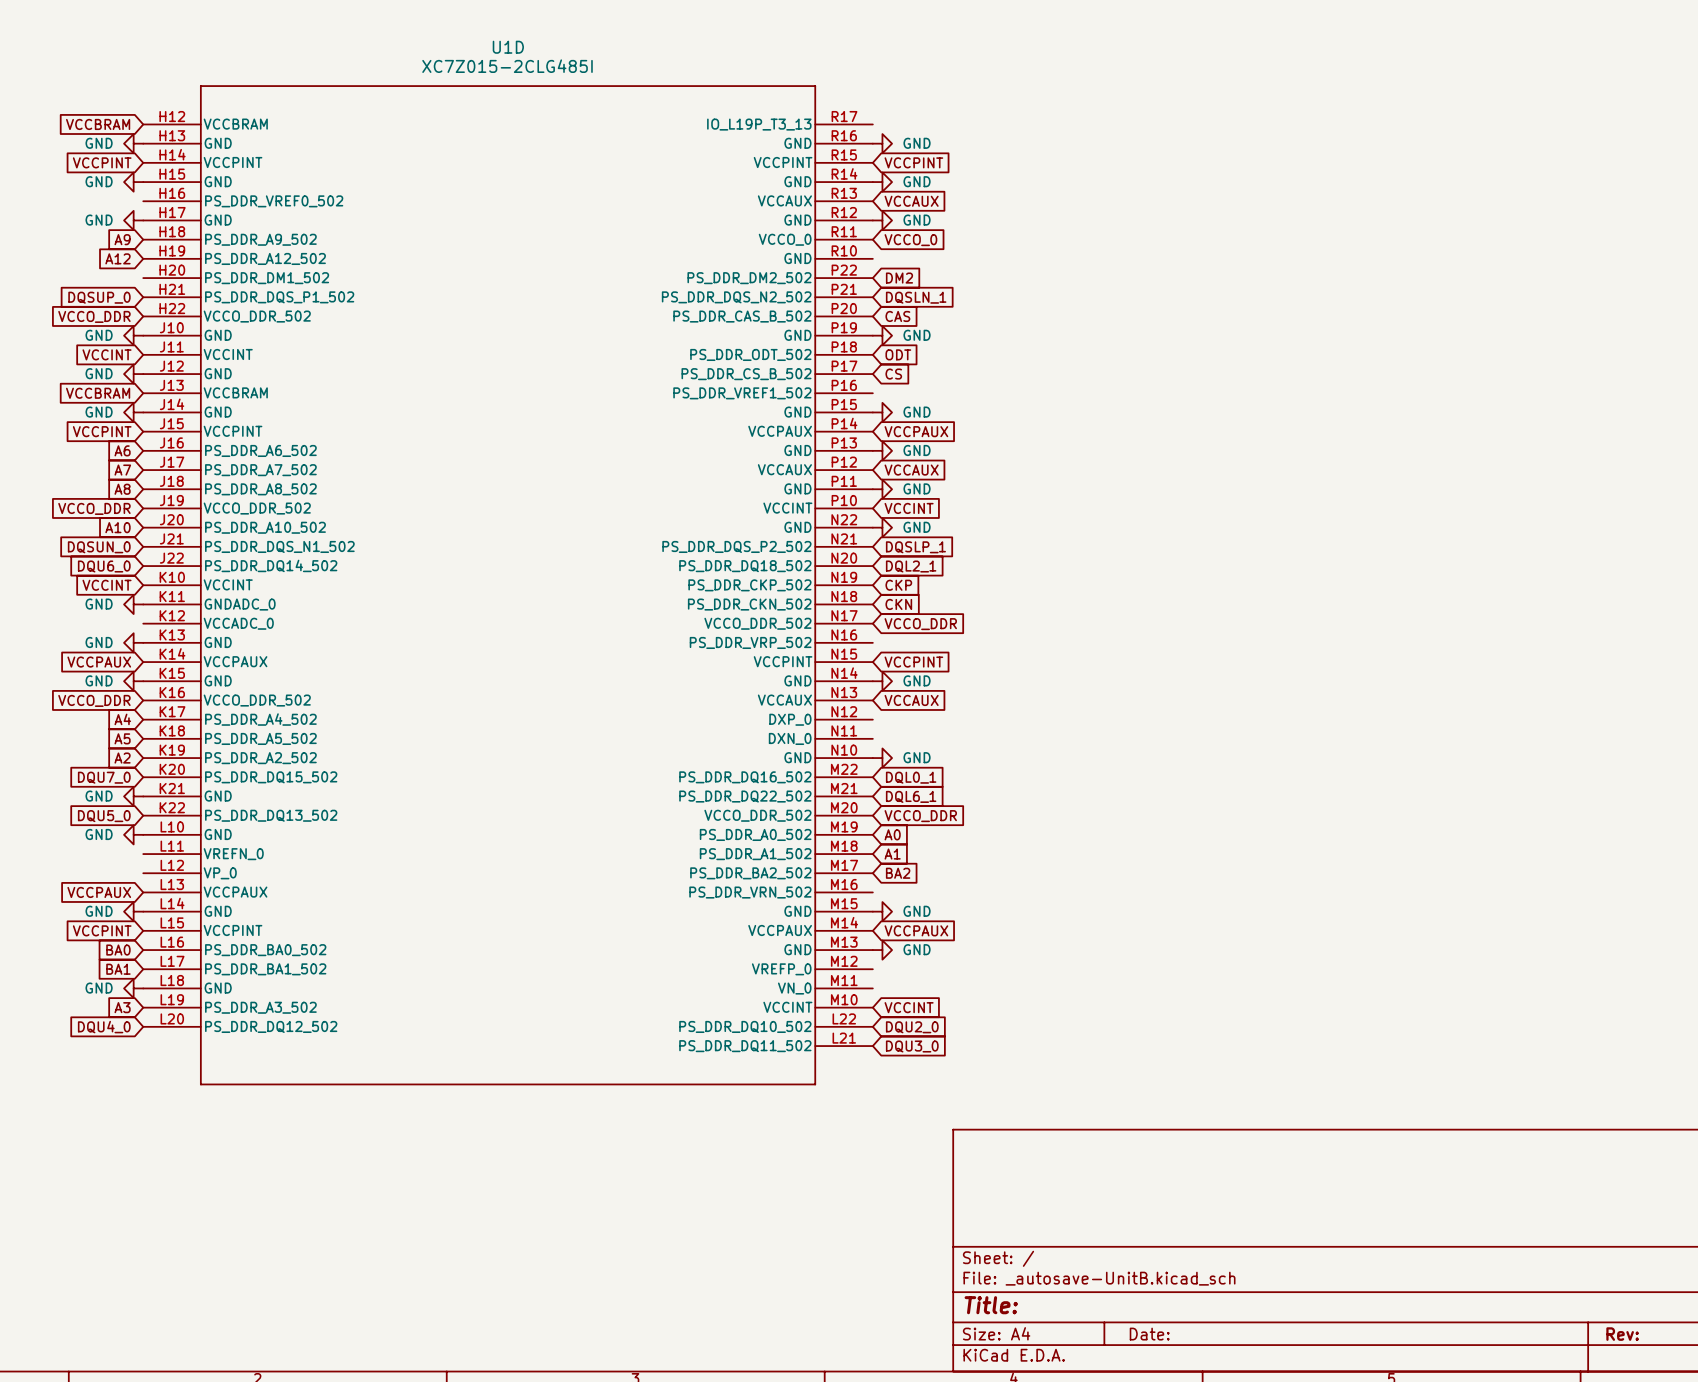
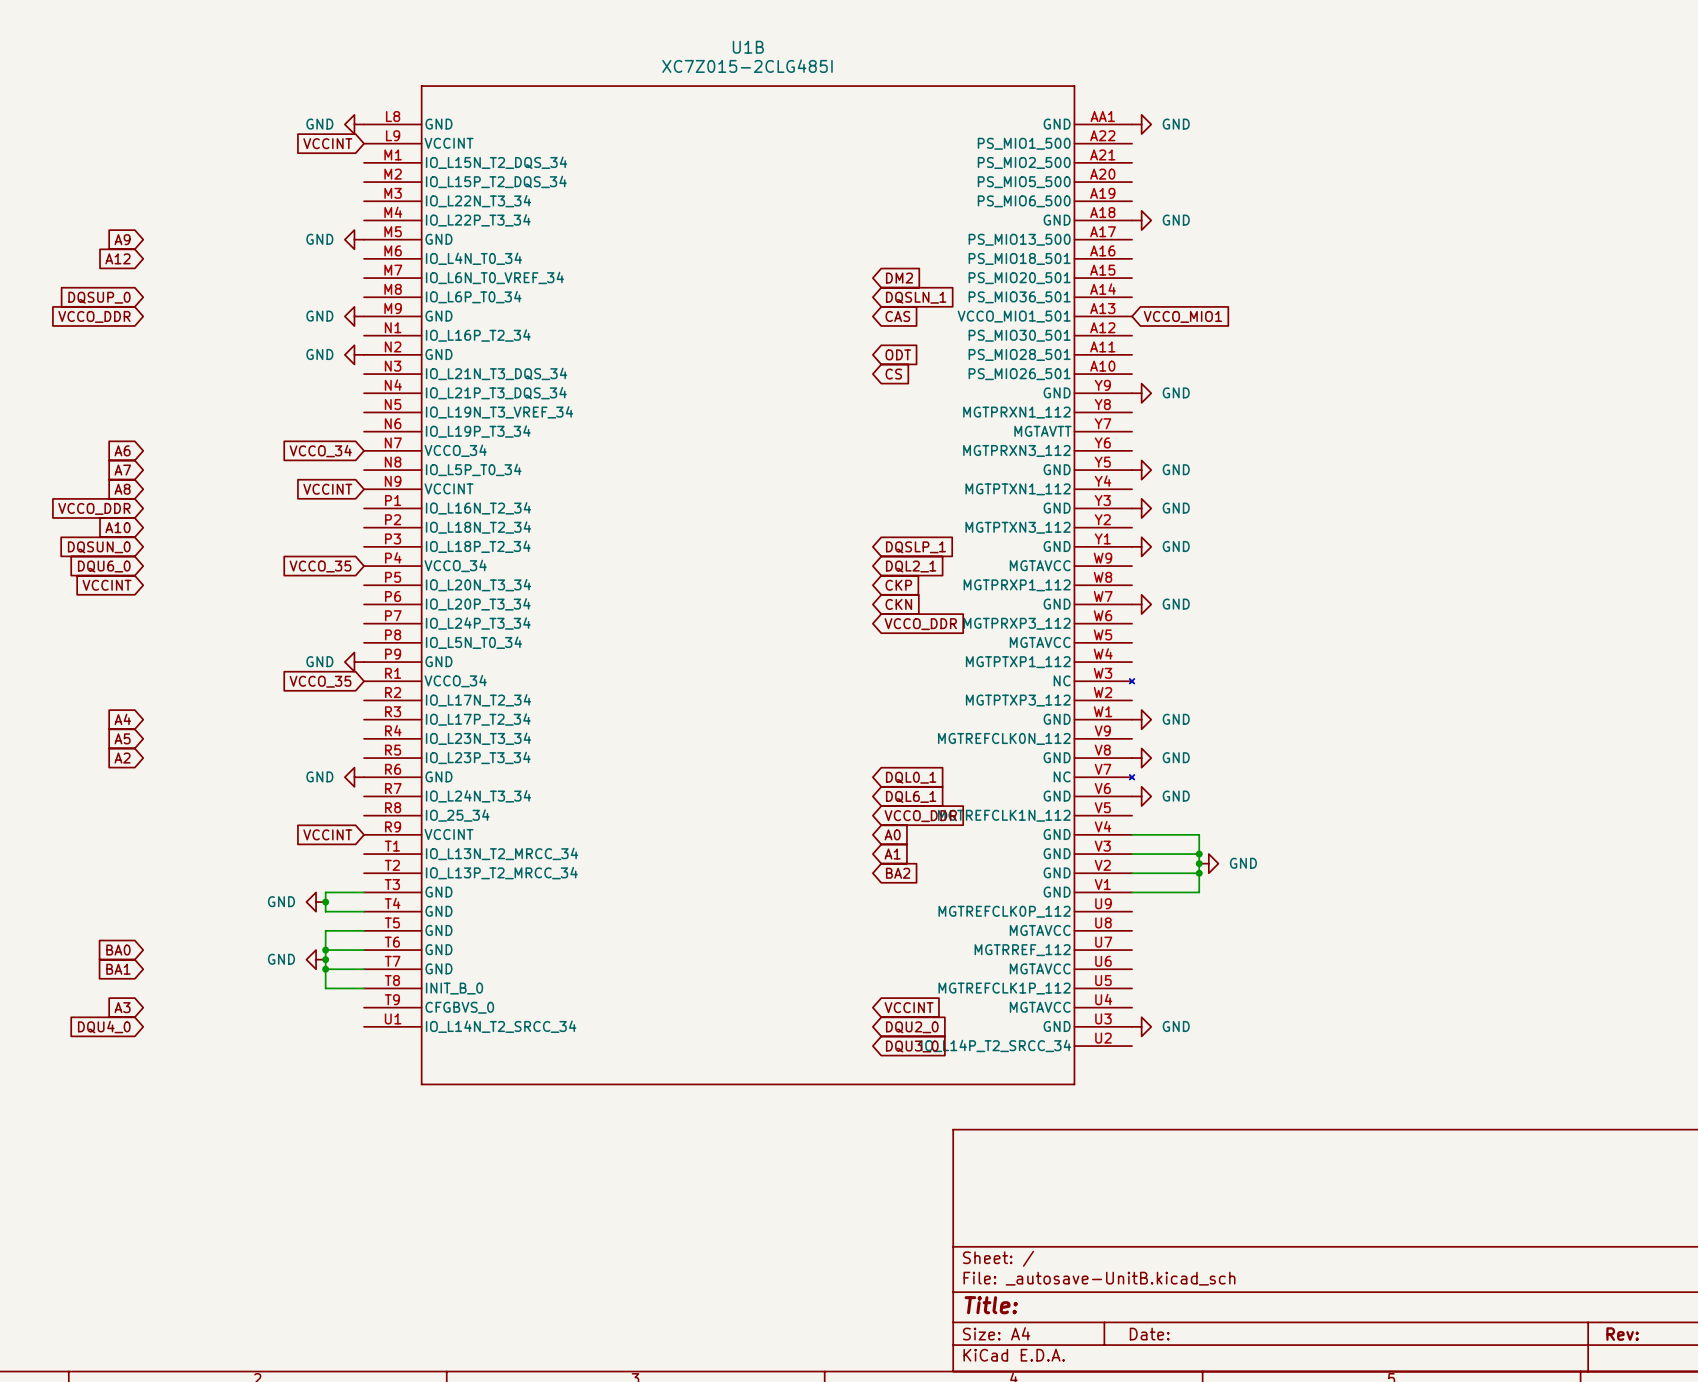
global label: VCCBRAM (98, 124) -> none
power symbol: none -> GND (354, 124)
power symbol: none -> GND (1141, 124)
power symbol: GND (133, 143) -> none
global label: none -> VCCINT (327, 143)
power symbol: GND (882, 143) -> none
global label: VCCPINT (102, 162) -> none
global label: VCCPINT (913, 162) -> none
power symbol: GND (133, 182) -> none
power symbol: GND (882, 182) -> none
global label: VCCAUX (911, 201) -> none
power symbol: GND (133, 220) -> none
power symbol: GND (882, 220) -> none
power symbol: none -> GND (1141, 220)
power symbol: none -> GND (354, 239)
global label: VCCO_0 (910, 240) -> none
power symbol: none -> GND (354, 316)
global label: none -> VCCO_MIO1 (1182, 316)
power symbol: GND (133, 335) -> none
power symbol: GND (882, 335) -> none
global label: VCCINT (107, 354) -> none
power symbol: none -> GND (354, 354)
power symbol: GND (133, 374) -> none
global label: VCCBRAM (98, 393) -> none
power symbol: none -> GND (1141, 393)
power symbol: GND (133, 412) -> none
power symbol: GND (882, 412) -> none
global label: VCCPINT (102, 431) -> none
global label: VCCPAUX (916, 431) -> none
power symbol: GND (882, 450) -> none
global label: none -> VCCO_34 (320, 451)
global label: VCCAUX (911, 470) -> none
power symbol: none -> GND (1141, 470)
global label: none -> VCCINT (327, 489)
power symbol: GND (882, 489) -> none
global label: VCCINT (909, 508) -> none
power symbol: none -> GND (1141, 508)
power symbol: GND (882, 527) -> none
power symbol: none -> GND (1141, 546)
global label: none -> VCCO_35 (320, 566)
U1D: XC7Z015-2CLG485I (508, 585) -> none
U1B: none -> XC7Z015-2CLG485I (749, 585)
power symbol: GND (133, 604) -> none
power symbol: none -> GND (1141, 604)
power symbol: GND (133, 642) -> none
global label: VCCPAUX (99, 662) -> none
power symbol: none -> GND (354, 662)
global label: VCCPINT (913, 662) -> none
power symbol: GND (133, 681) -> none
global label: none -> VCCO_35 (320, 681)
power symbol: GND (882, 681) -> none
global label: VCCO_DDR (94, 700) -> none
global label: VCCAUX (911, 700) -> none
power symbol: none -> GND (1141, 719)
power symbol: GND (882, 758) -> none
power symbol: none -> GND (1141, 758)
global label: DQU7_0 (104, 777) -> none
power symbol: none -> GND (354, 777)
power symbol: GND (133, 796) -> none
power symbol: none -> GND (1141, 796)
global label: DQU5_0 (104, 816) -> none
power symbol: GND (133, 834) -> none
global label: none -> VCCINT (327, 834)
wire: none -> (1132, 834) (1199, 834) (1199, 892) (1132, 892)
wire: none -> (1132, 854) (1199, 854)
junction: none -> (1199, 854)
junction: none -> (1199, 863)
power symbol: none -> GND (1208, 863)
wire: none -> (1132, 873) (1199, 873)
junction: none -> (1199, 873)
global label: VCCPAUX (99, 892) -> none
wire: none -> (364, 892) (325, 892) (325, 911) (364, 911)
power symbol: none -> GND (316, 902)
junction: none -> (325, 902)
power symbol: GND (133, 911) -> none
power symbol: GND (882, 911) -> none
global label: VCCPINT (102, 930) -> none
wire: none -> (364, 930) (325, 930) (325, 988) (364, 988)
global label: VCCPAUX (916, 930) -> none
wire: none -> (325, 950) (364, 950)
junction: none -> (325, 950)
power symbol: GND (882, 950) -> none
power symbol: none -> GND (316, 959)
junction: none -> (325, 959)
wire: none -> (325, 969) (364, 969)
junction: none -> (325, 969)
power symbol: GND (133, 988) -> none
power symbol: none -> GND (1141, 1026)

